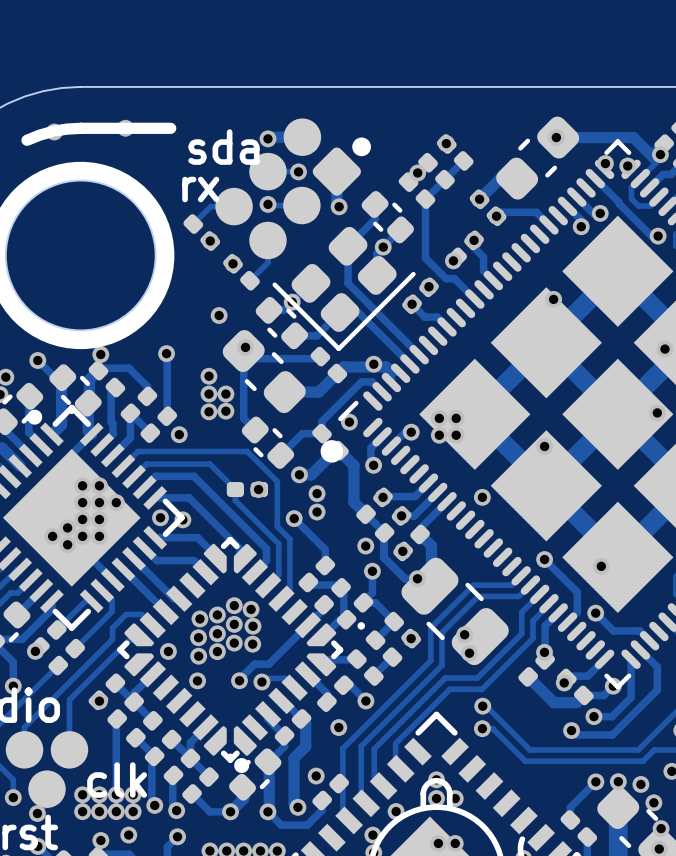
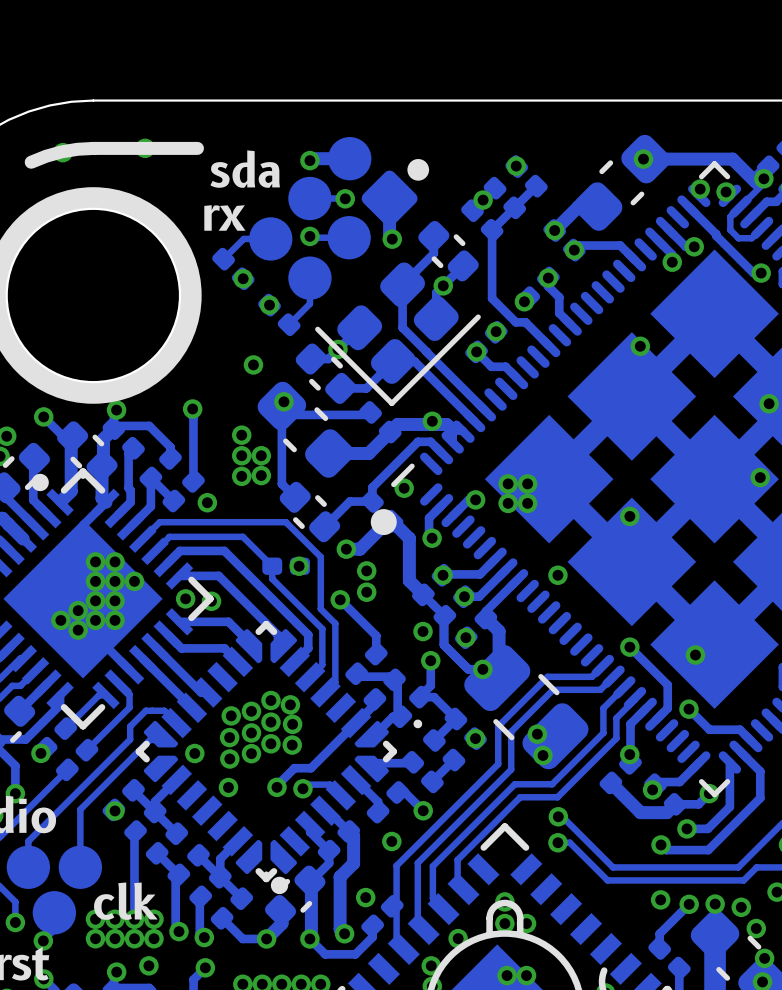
via: none -> (660, 899)

